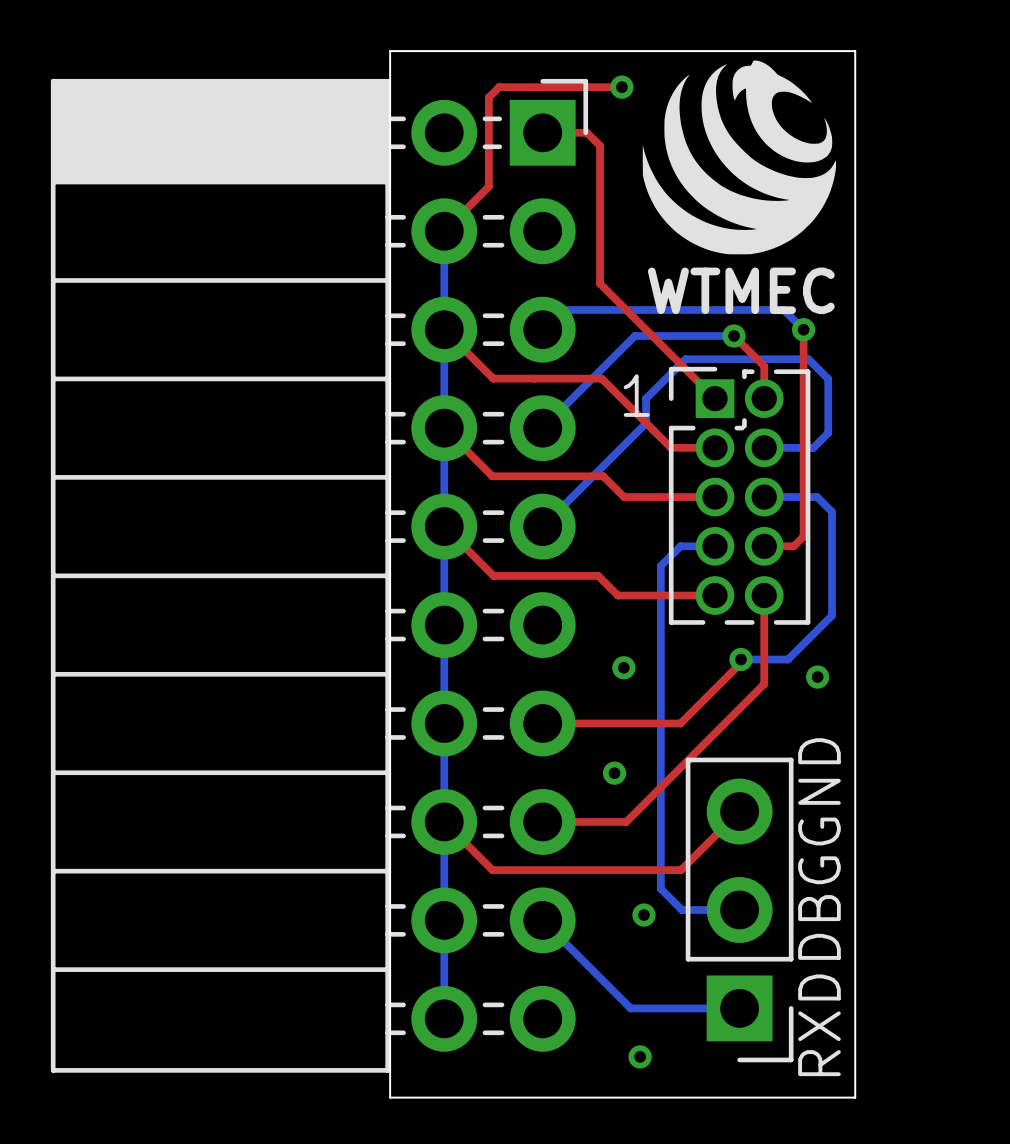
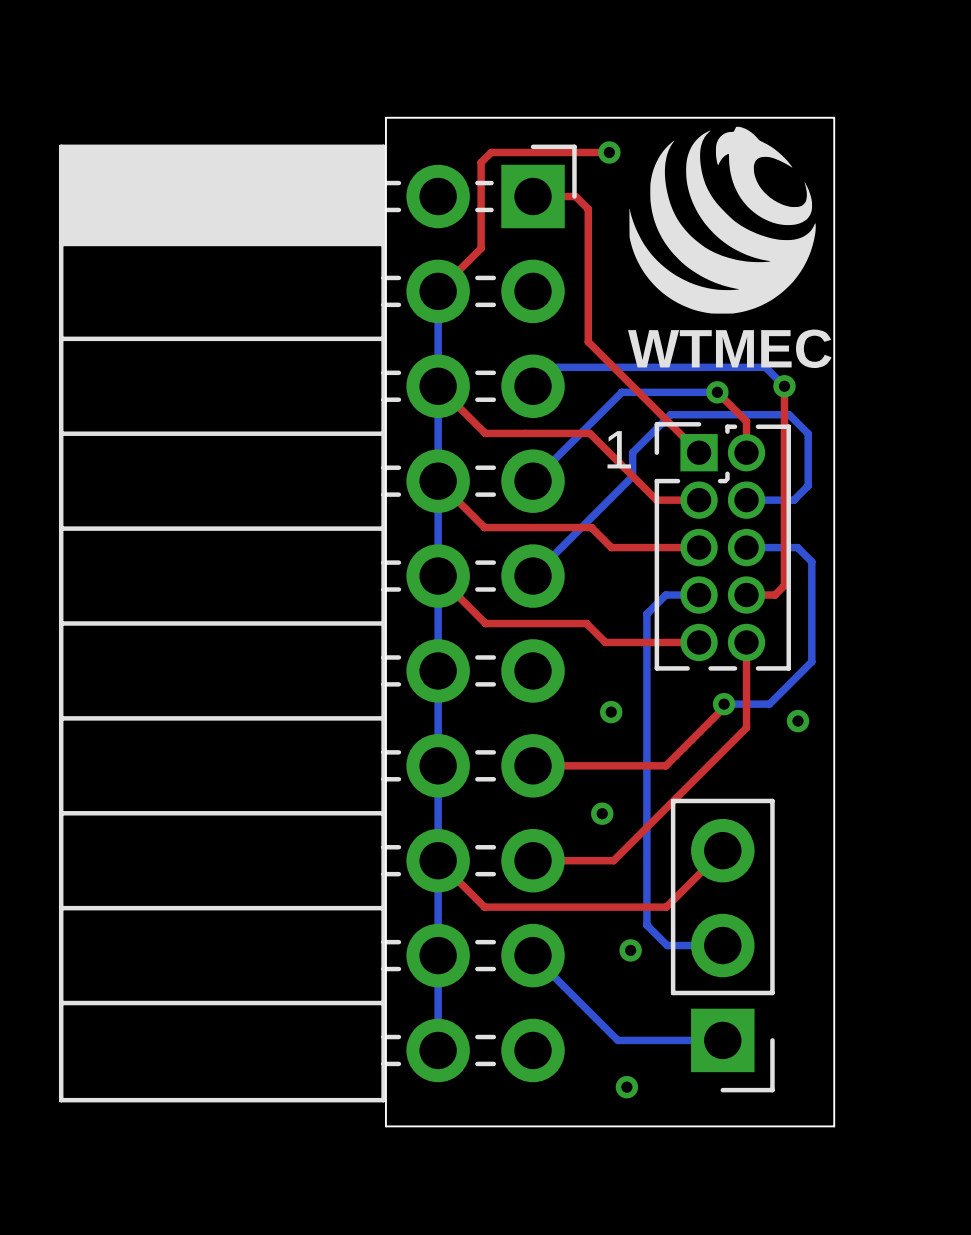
text: GND (819, 791) -> none
text: DBG (819, 908) -> none
text: RXD (819, 1025) -> none

